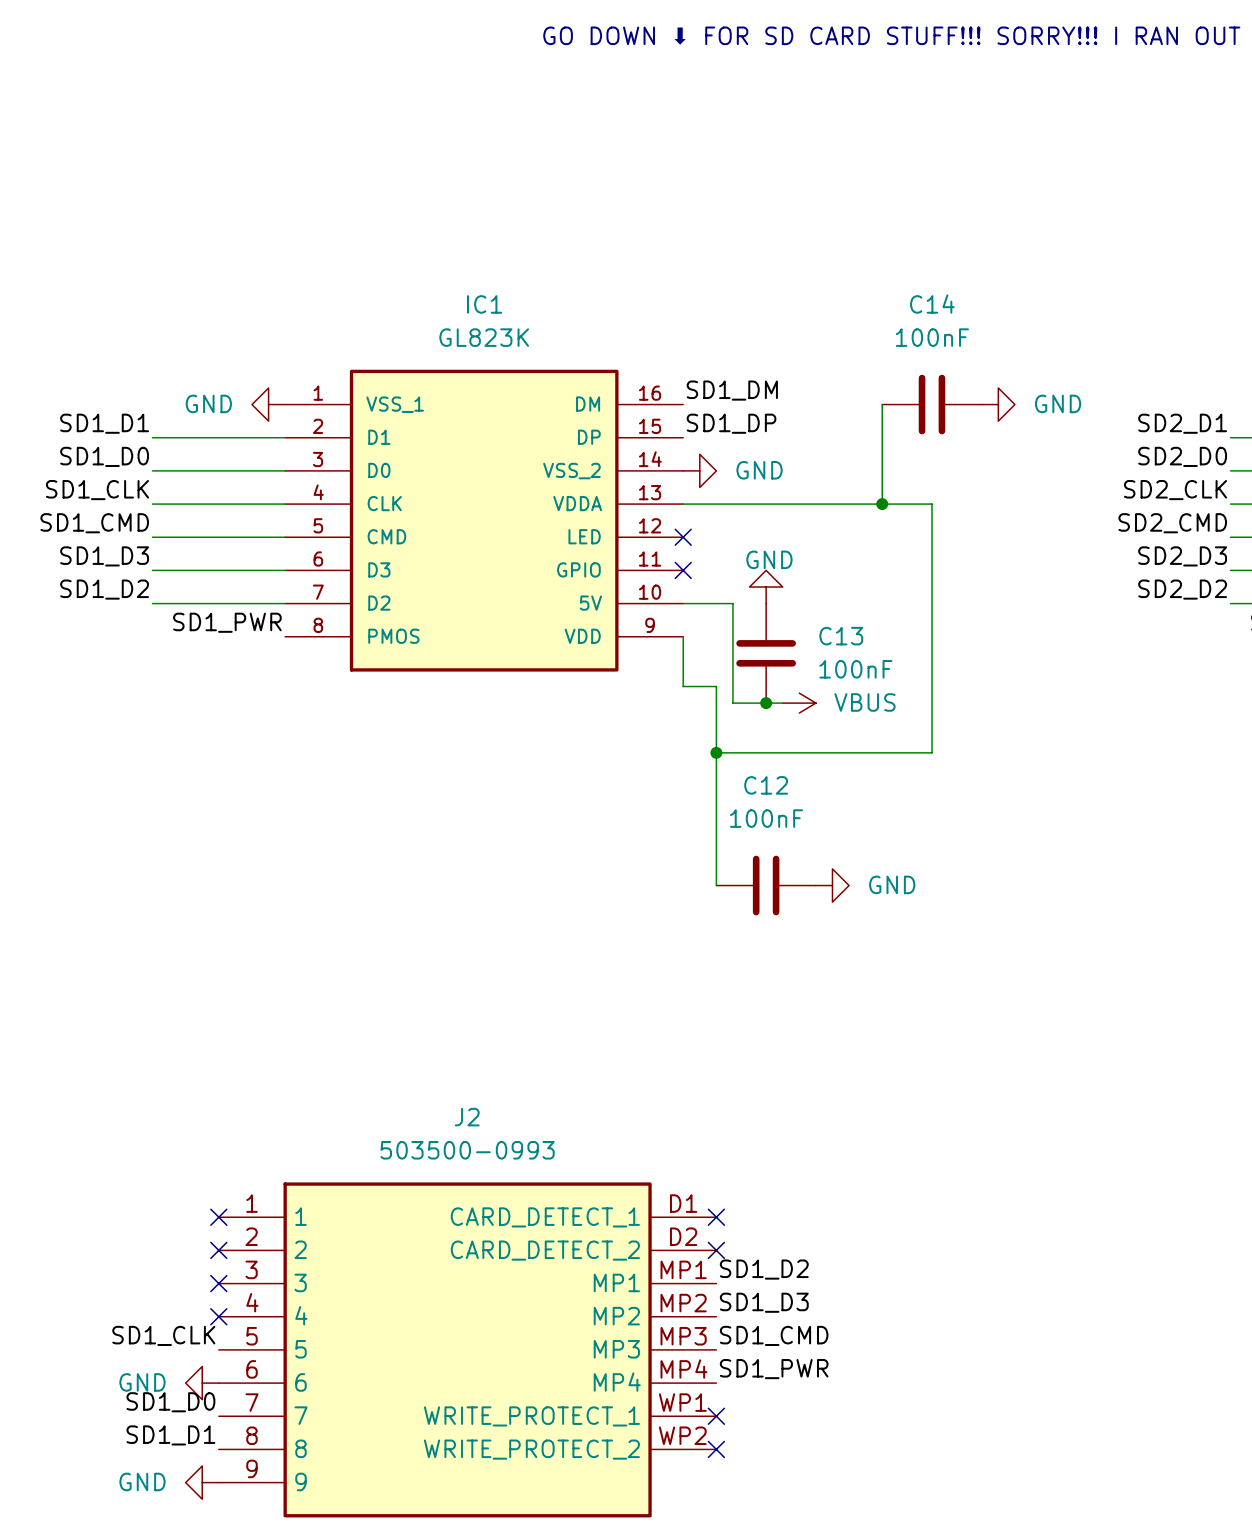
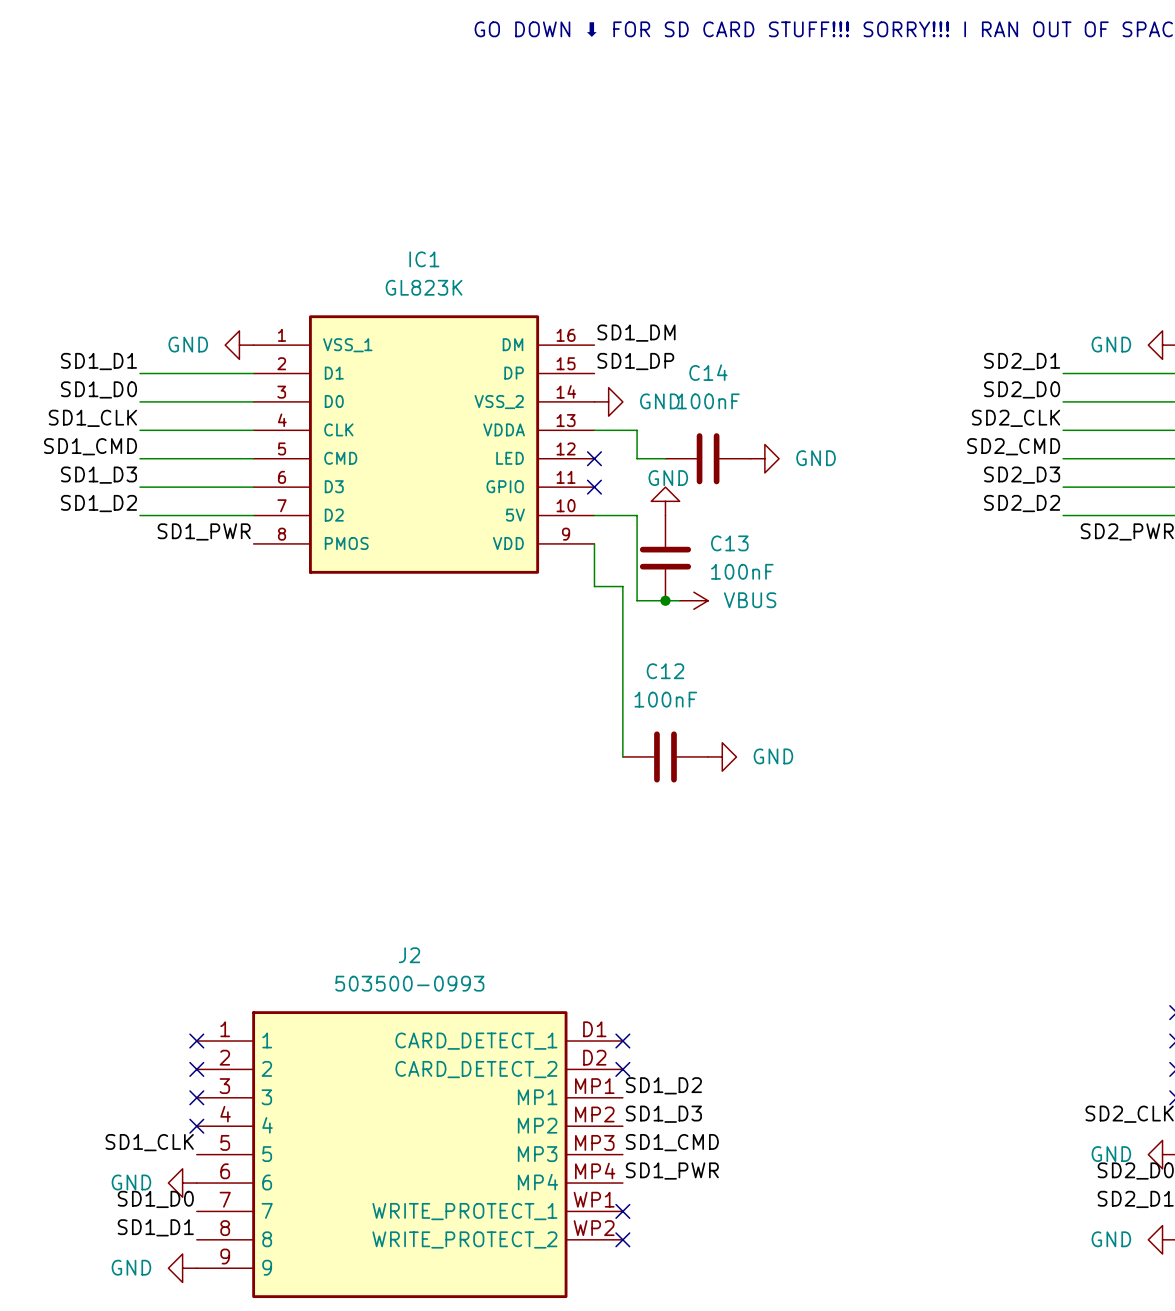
wire: (882, 404) (882, 504) -> none
C14 position: (931, 404) -> (708, 458)
power symbol position: GND (998, 404) -> GND (764, 458)
wire: (732, 504) (931, 504) (931, 752) (716, 752) -> (637, 430) (637, 458) (665, 458)
junction: (882, 504) -> none
junction: (716, 752) -> none

